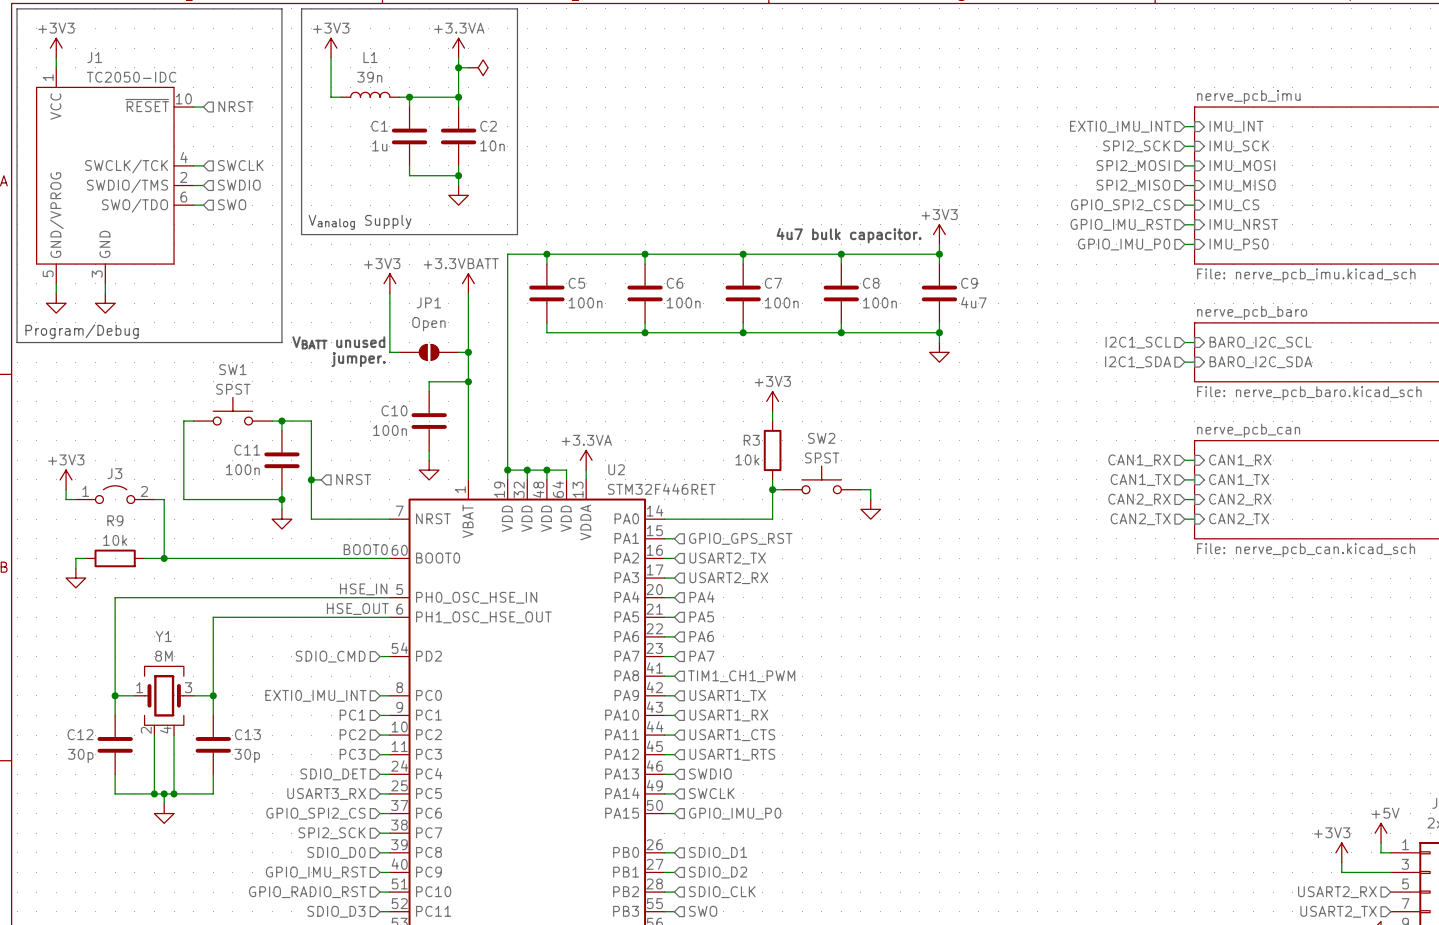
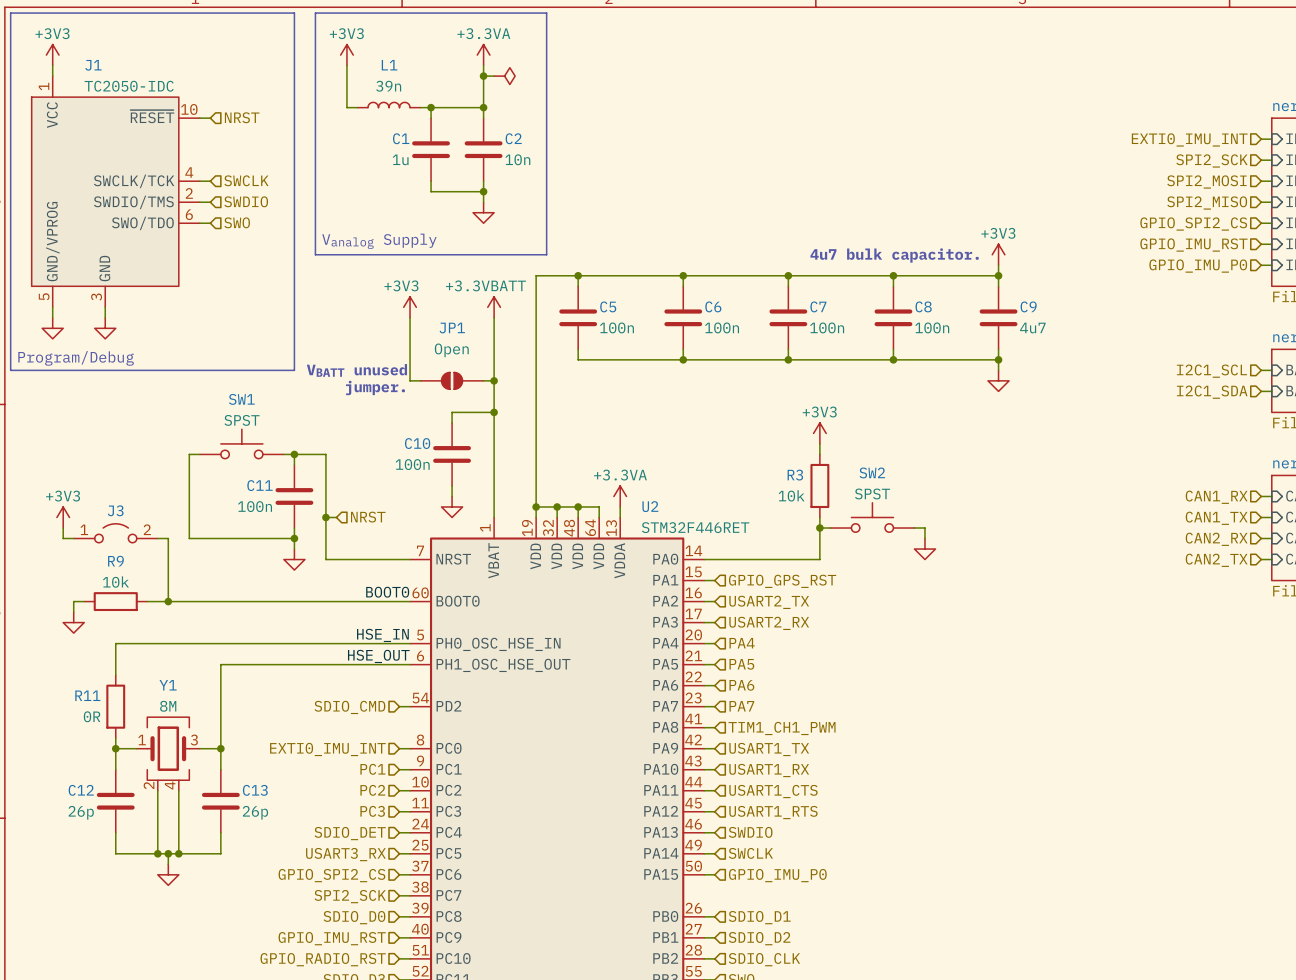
wire: (115, 627) (115, 685) -> none
R11: none -> 0R (115, 706)
C12 value: 30p (80, 755) -> 26p (81, 812)
C13 value: 30p (247, 755) -> 26p (255, 812)

